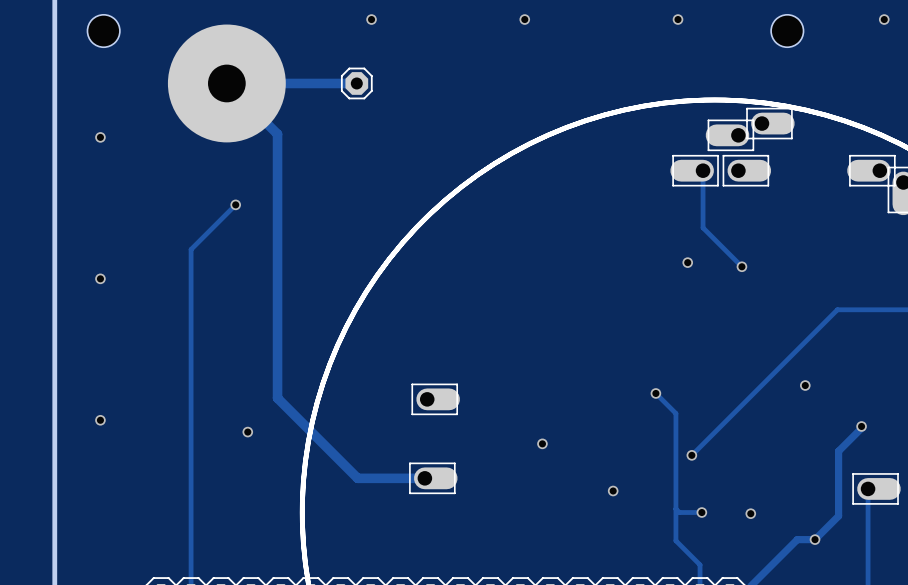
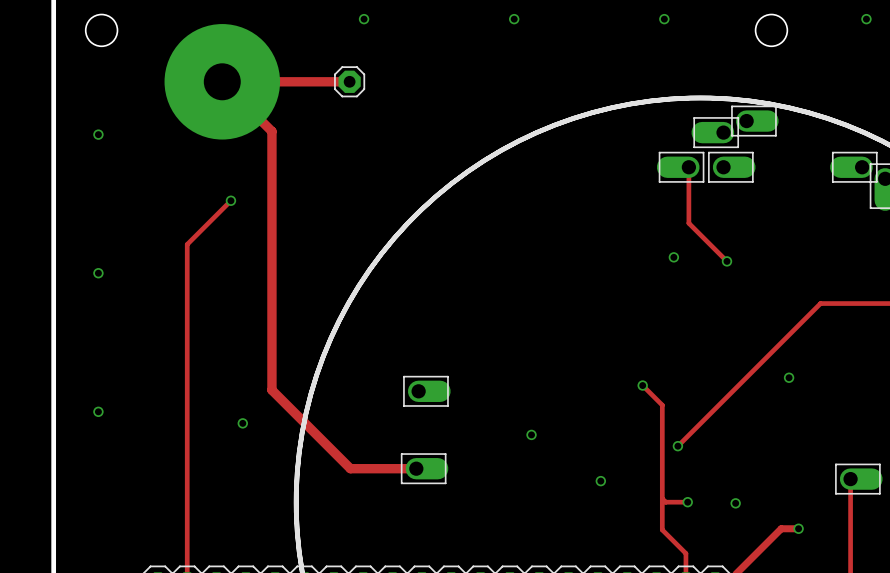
track: (861, 426) (838, 451) (838, 516) (815, 539) -> none
via: (861, 426) -> none

